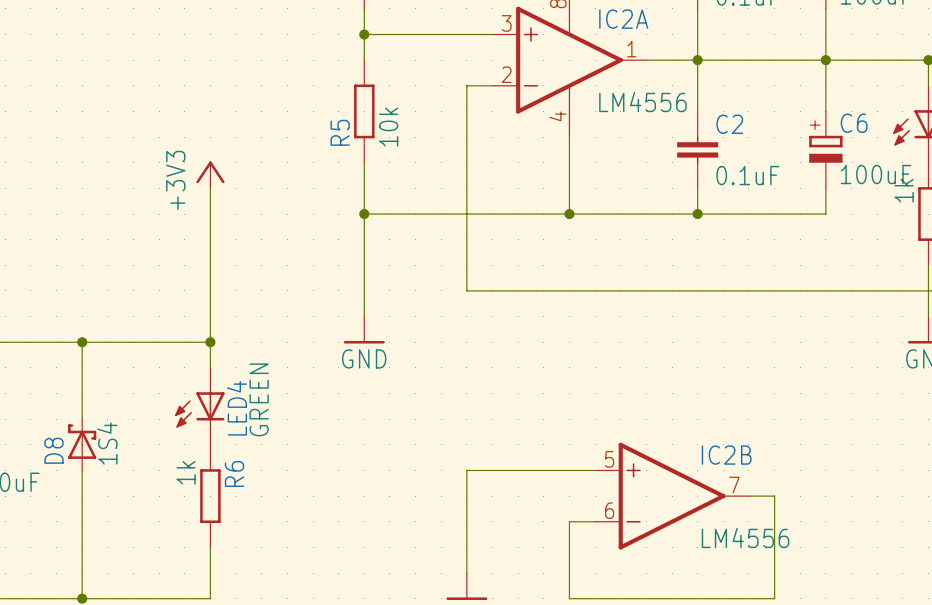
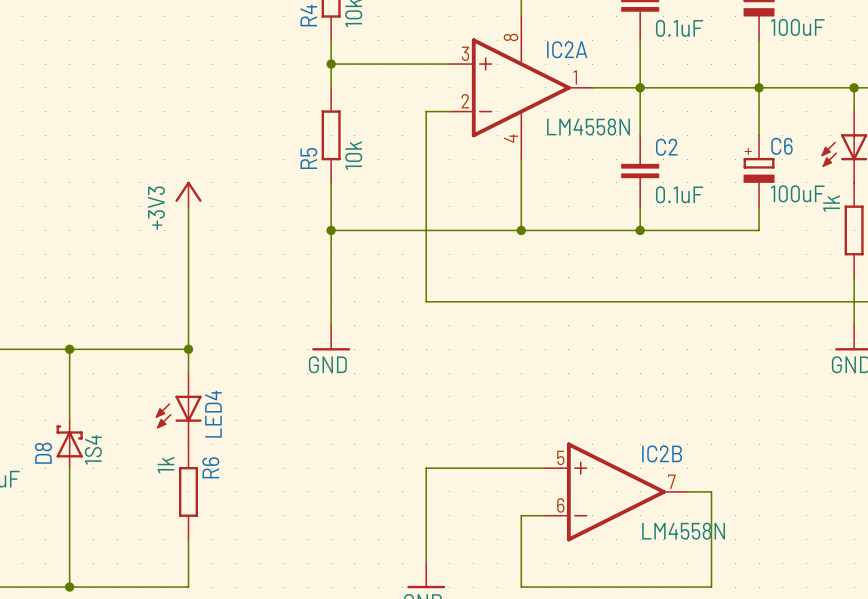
IC2A value: LM4556 (642, 102) -> LM4558N (588, 127)
LED4 value: GREEN (259, 399) -> none
IC2B value: LM4556 (745, 537) -> LM4558N (683, 531)

